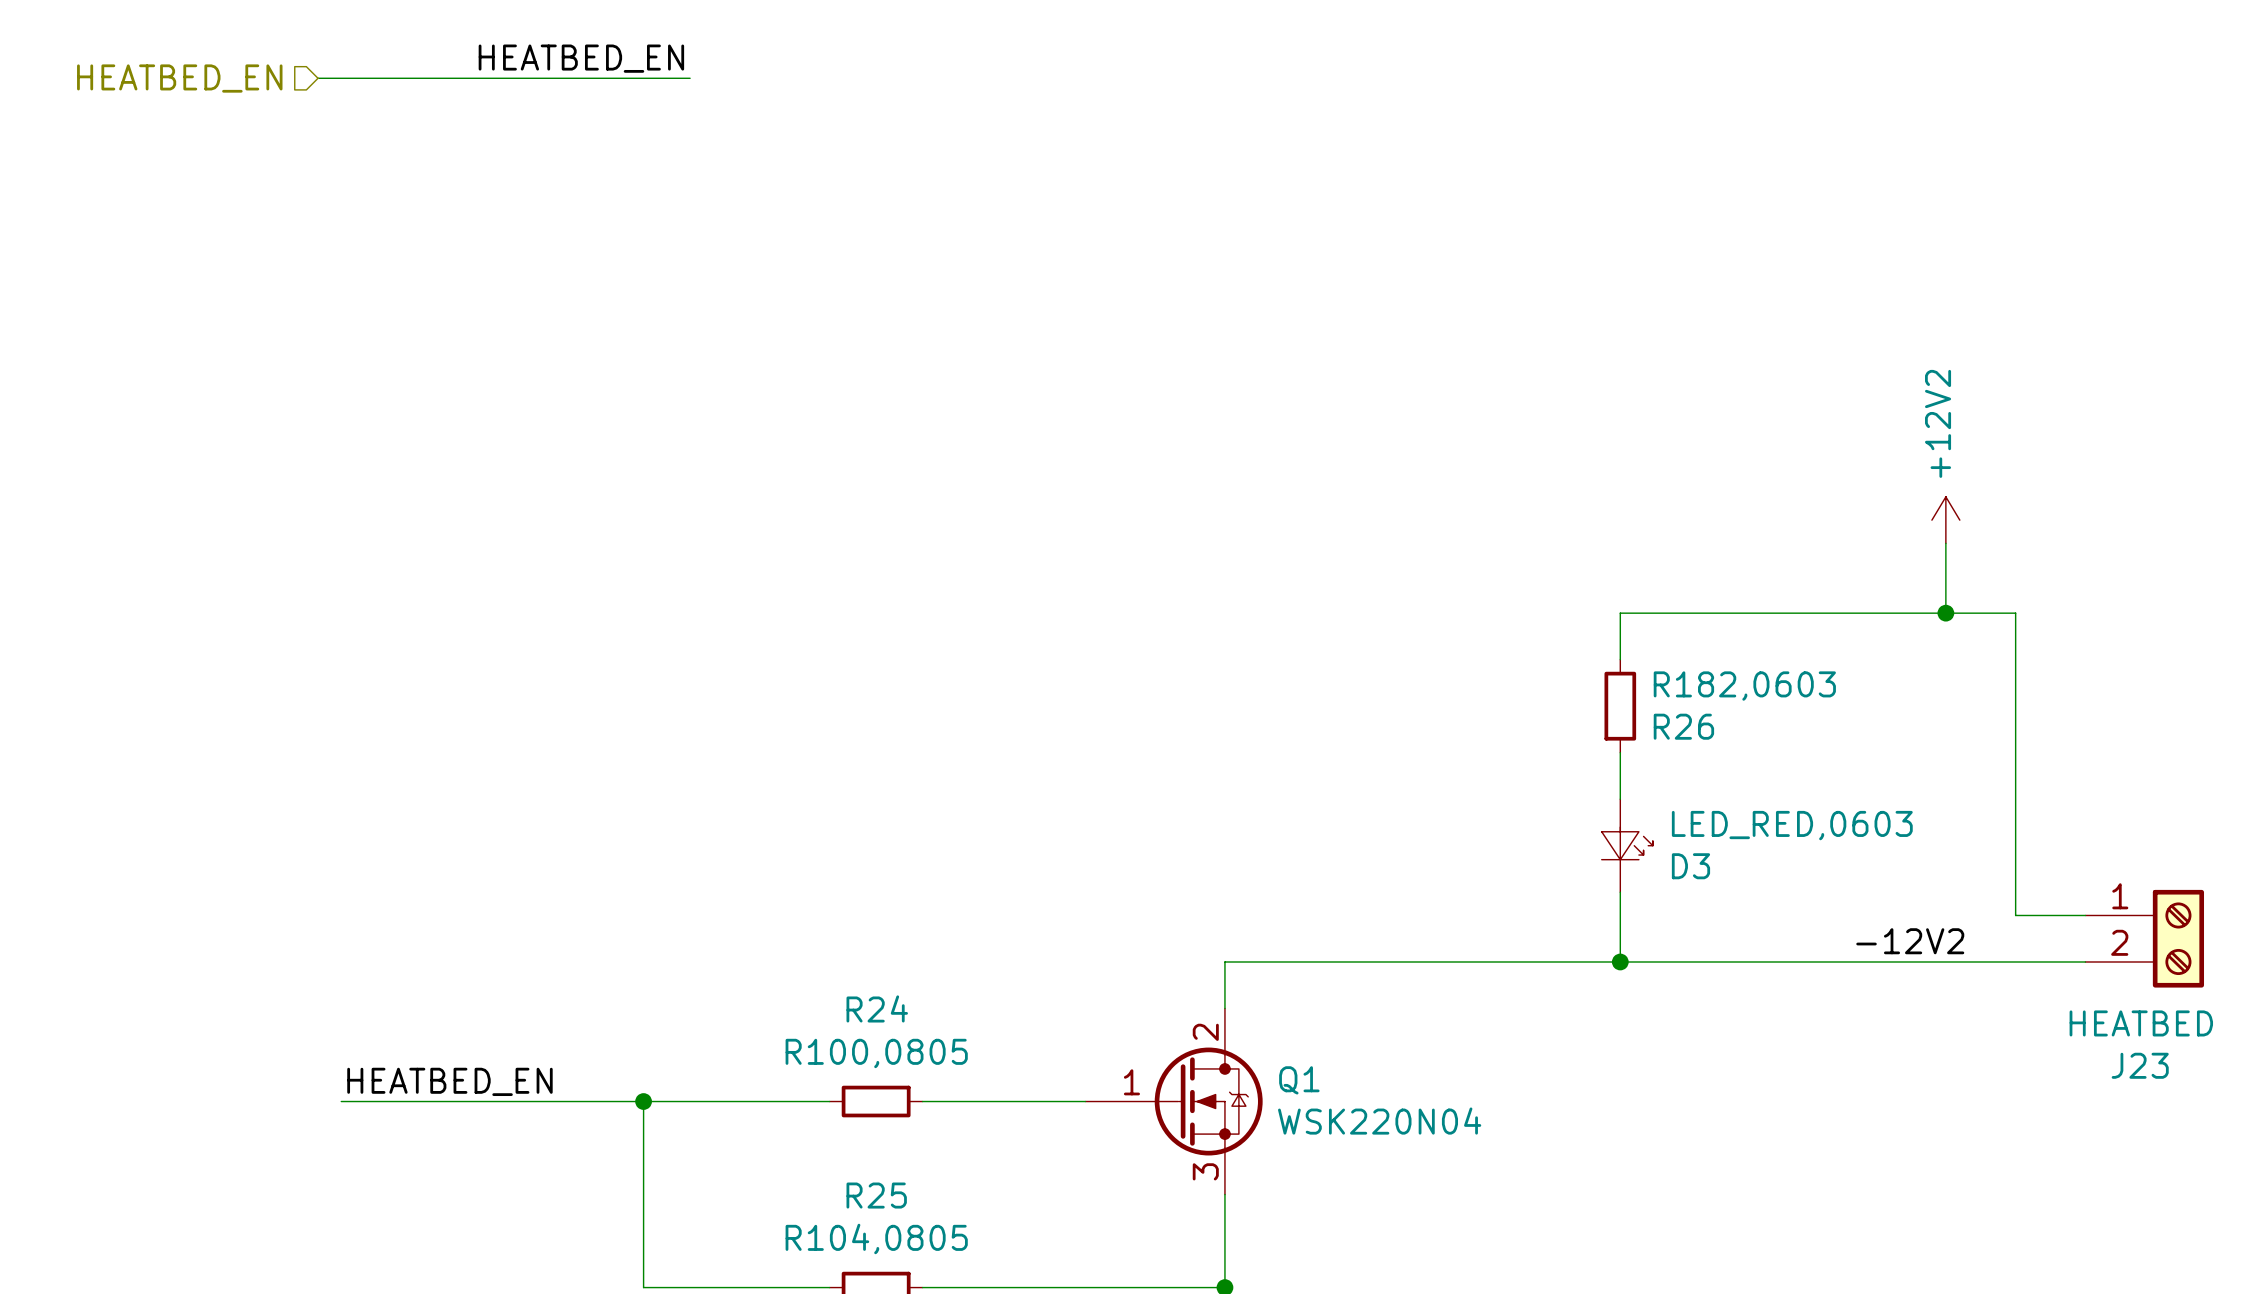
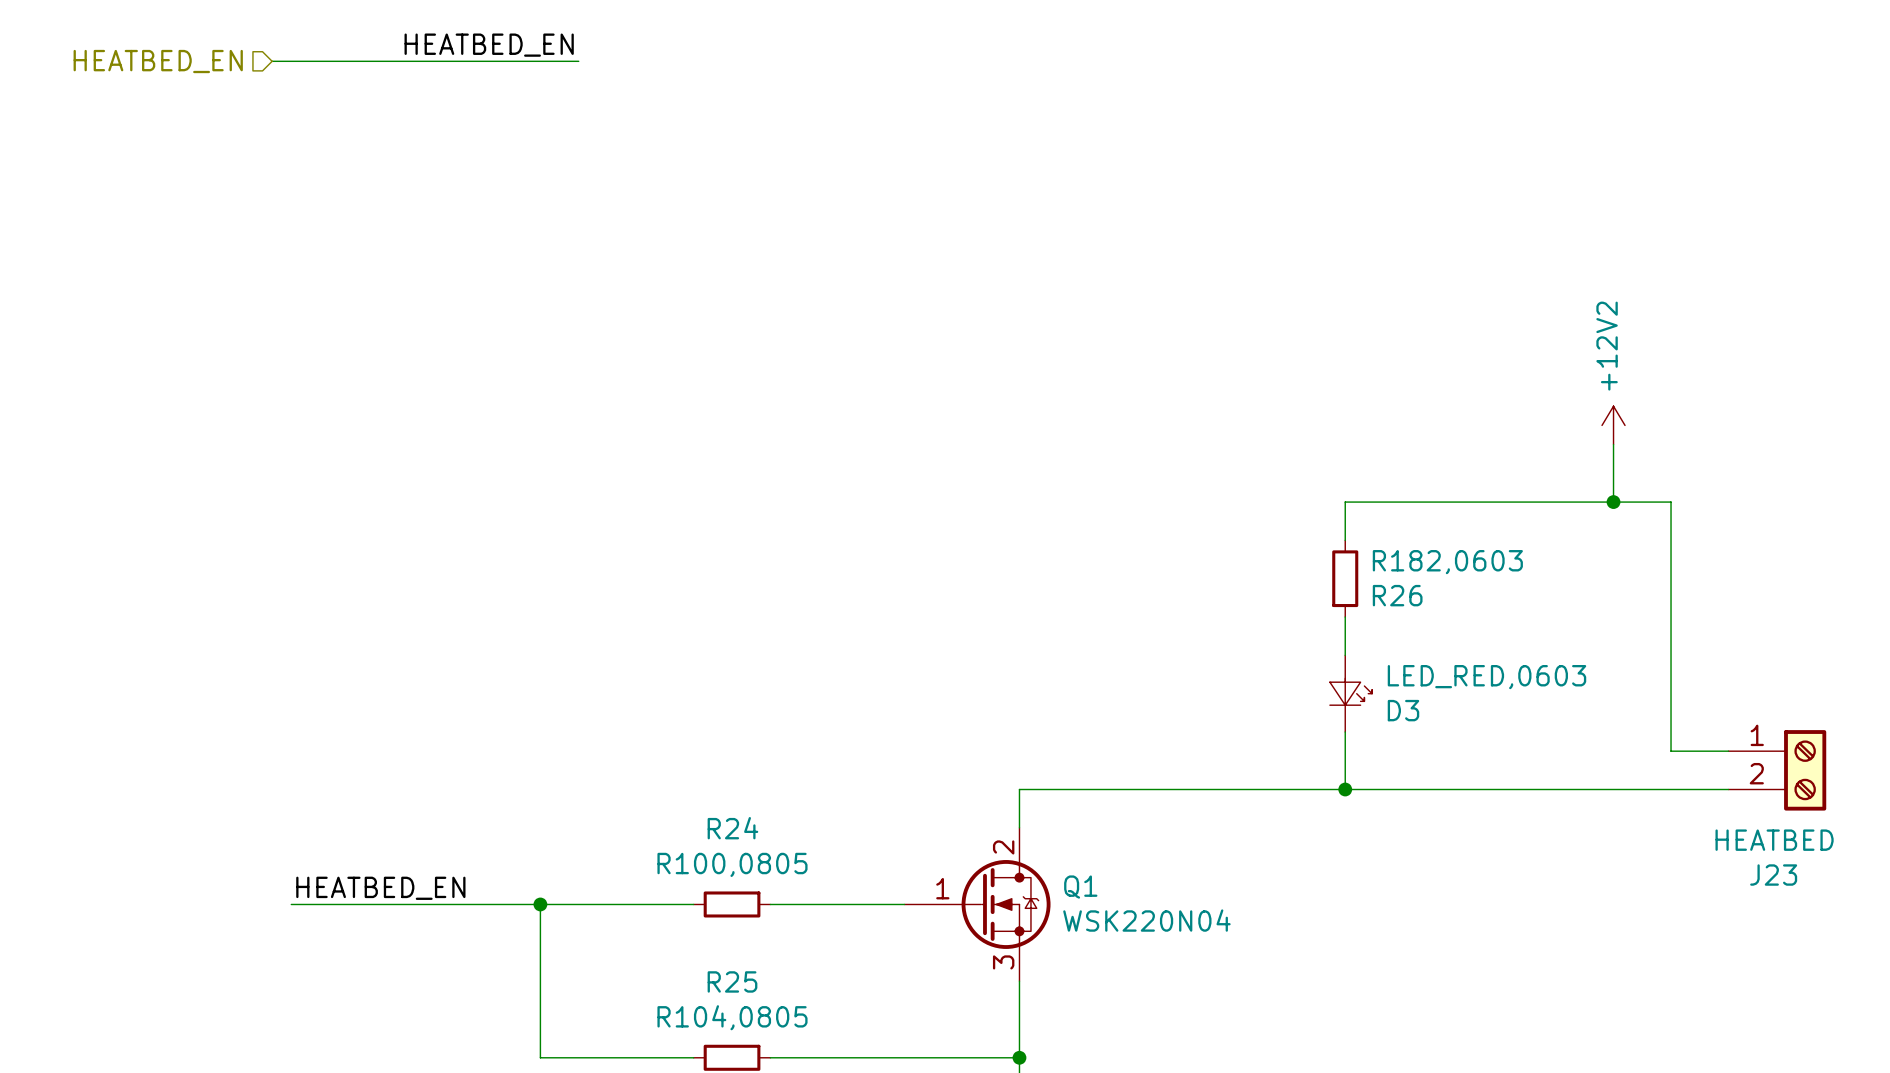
label: -12V2 (1910, 941) -> none

